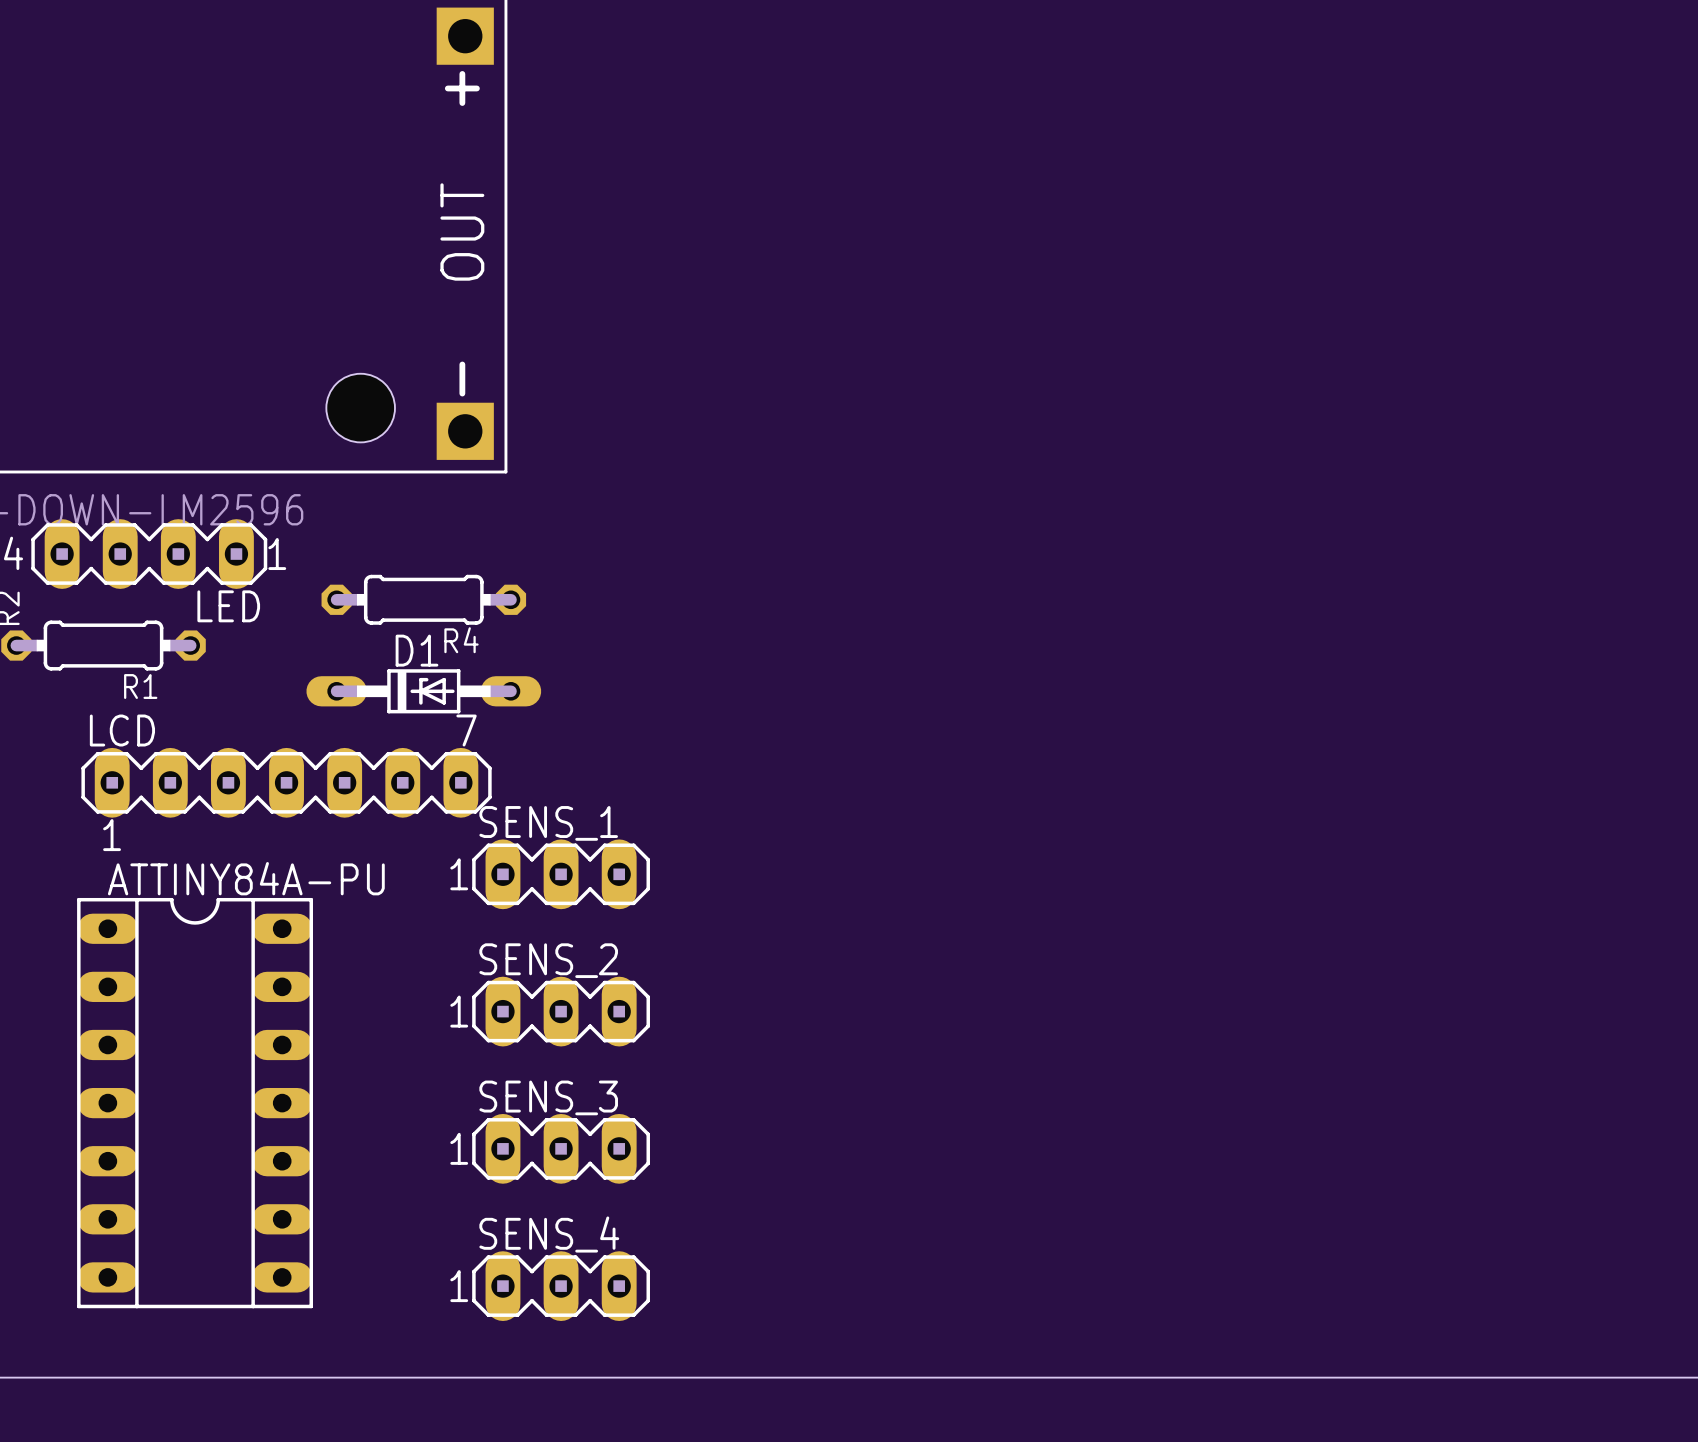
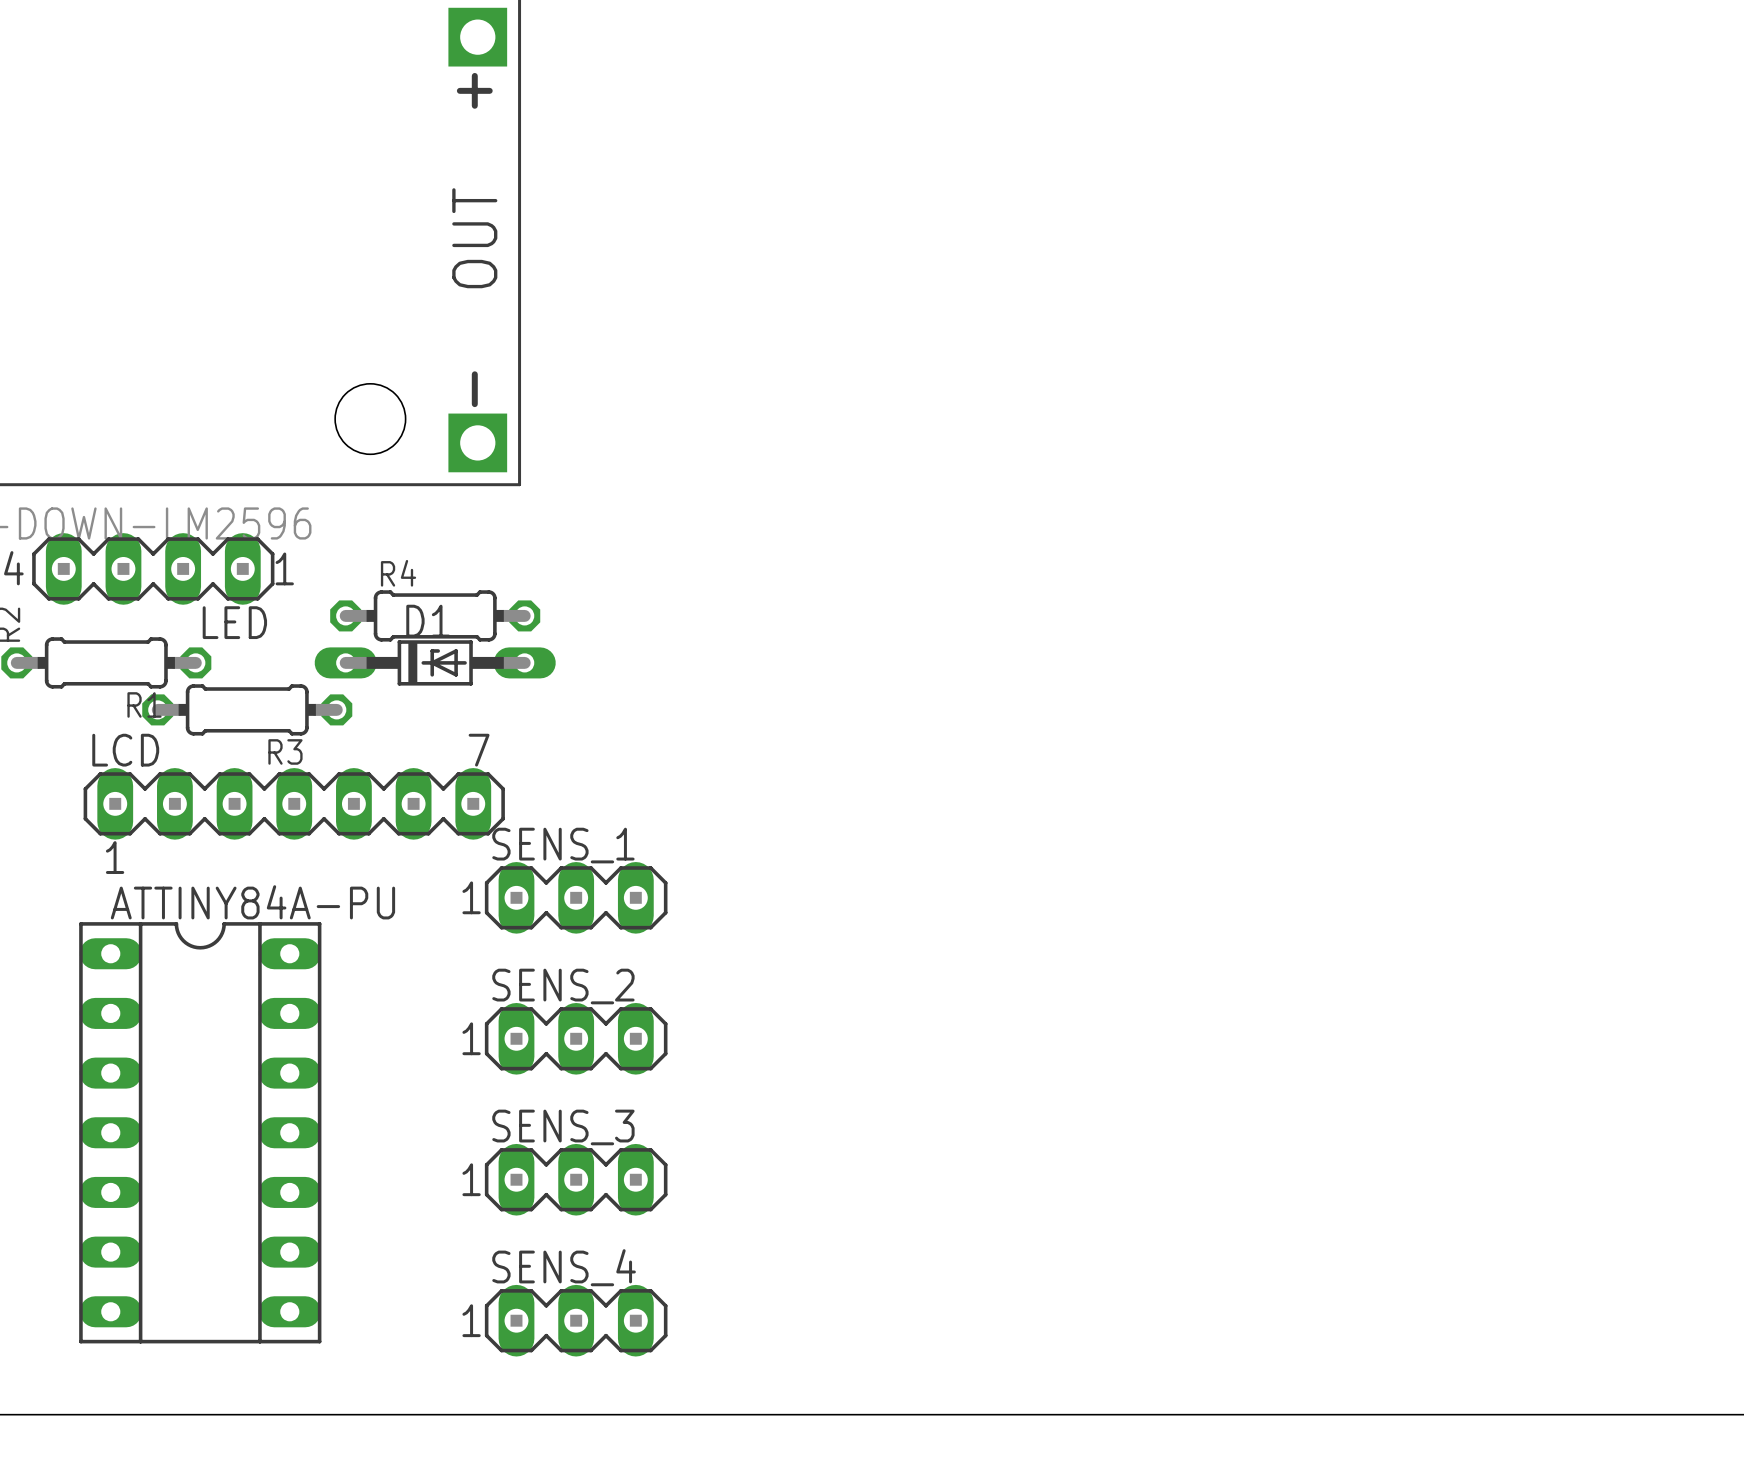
R4 name position: R4 (461, 640) -> R4 (398, 573)
R3: none -> (247, 709)
D1 position: (423, 691) -> (435, 662)

